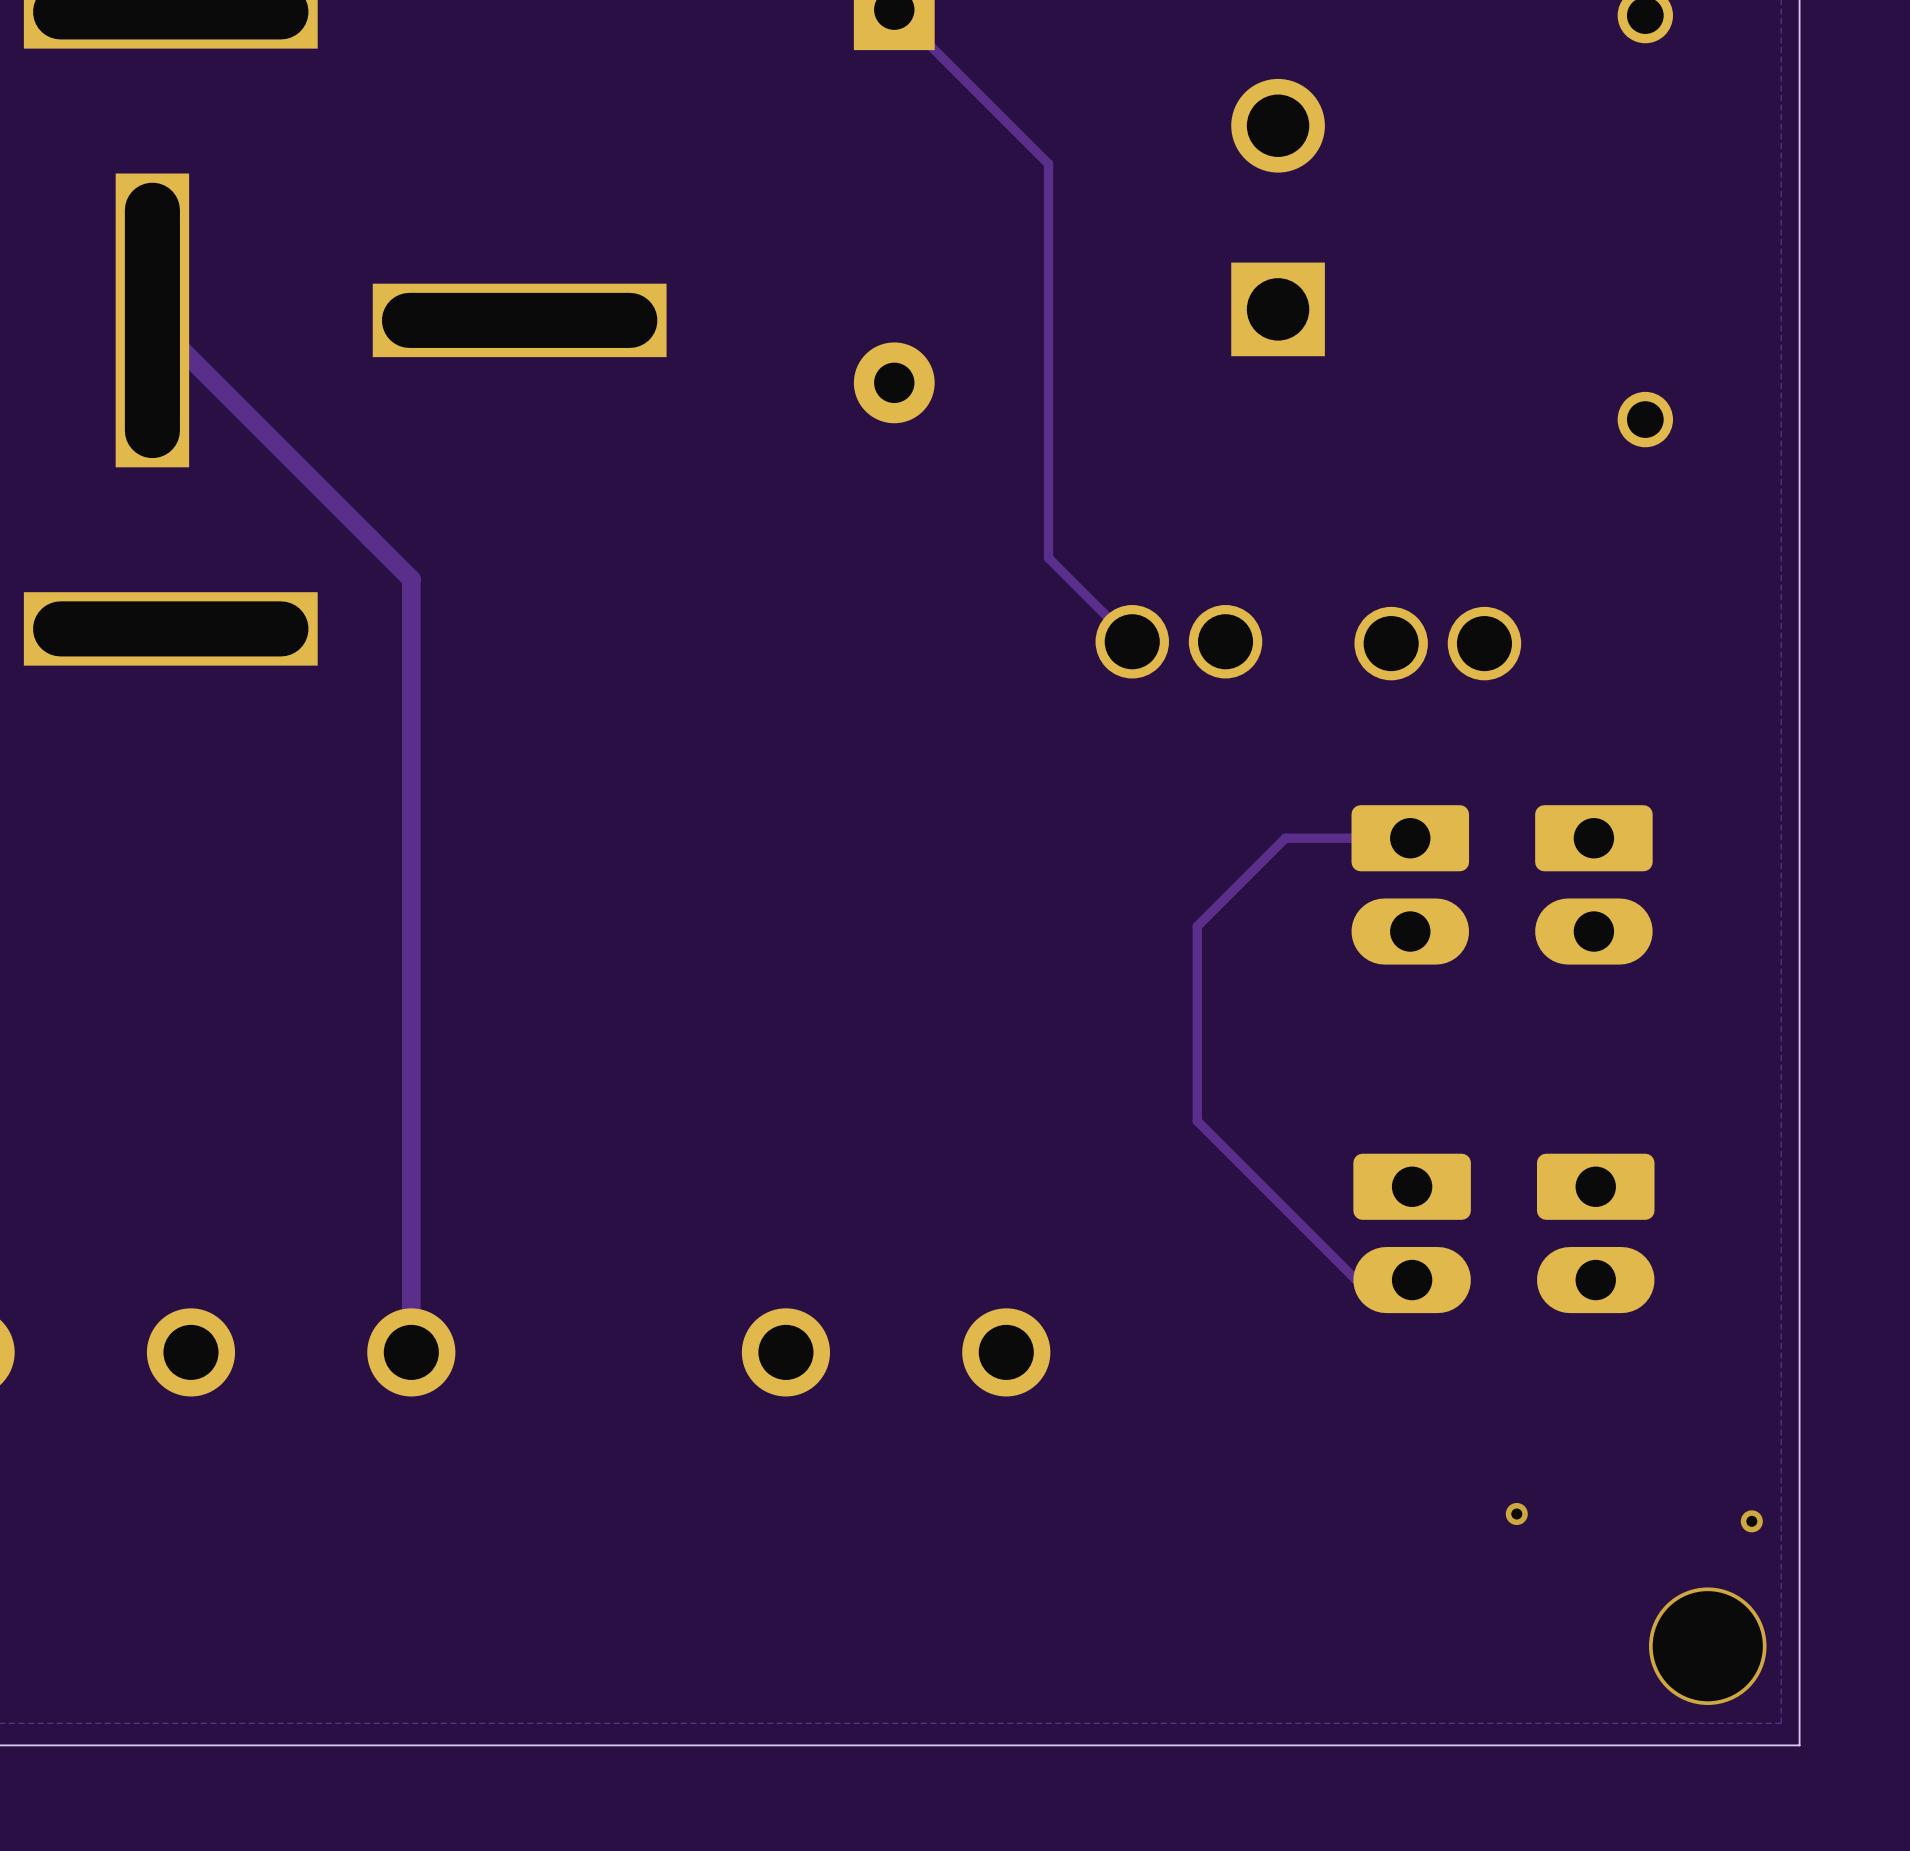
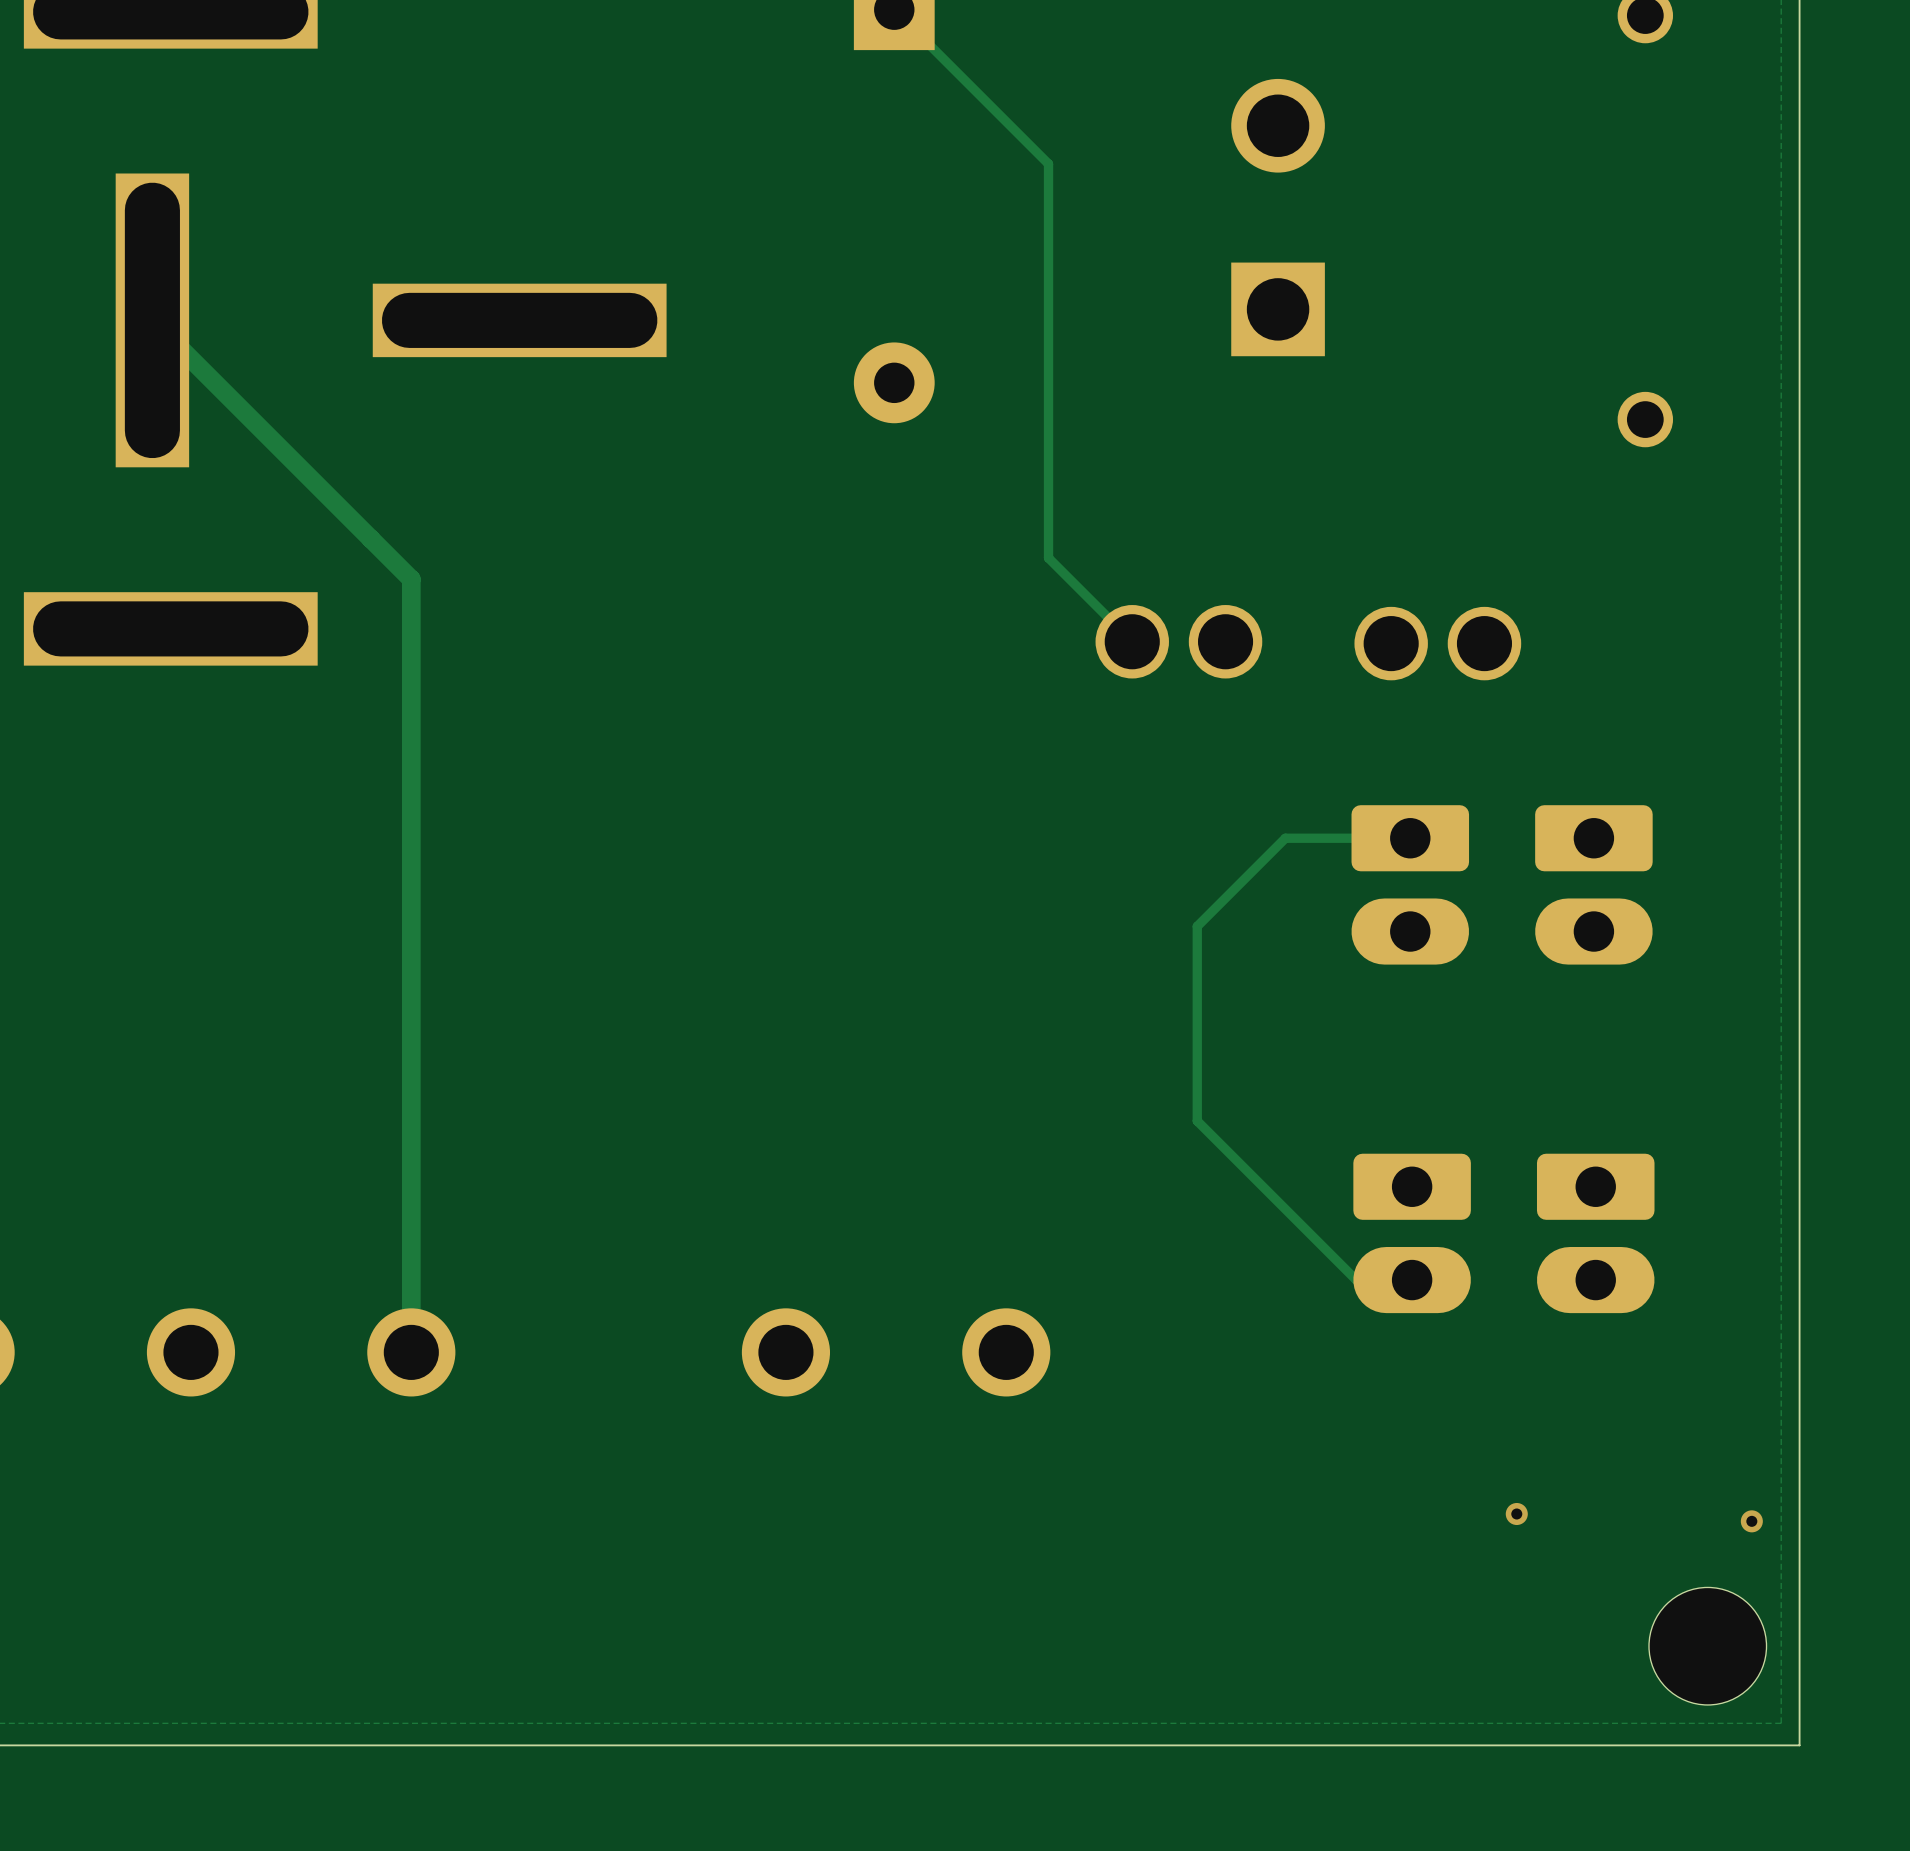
via: (1707, 1646) -> none
part: none -> (1707, 1646)

